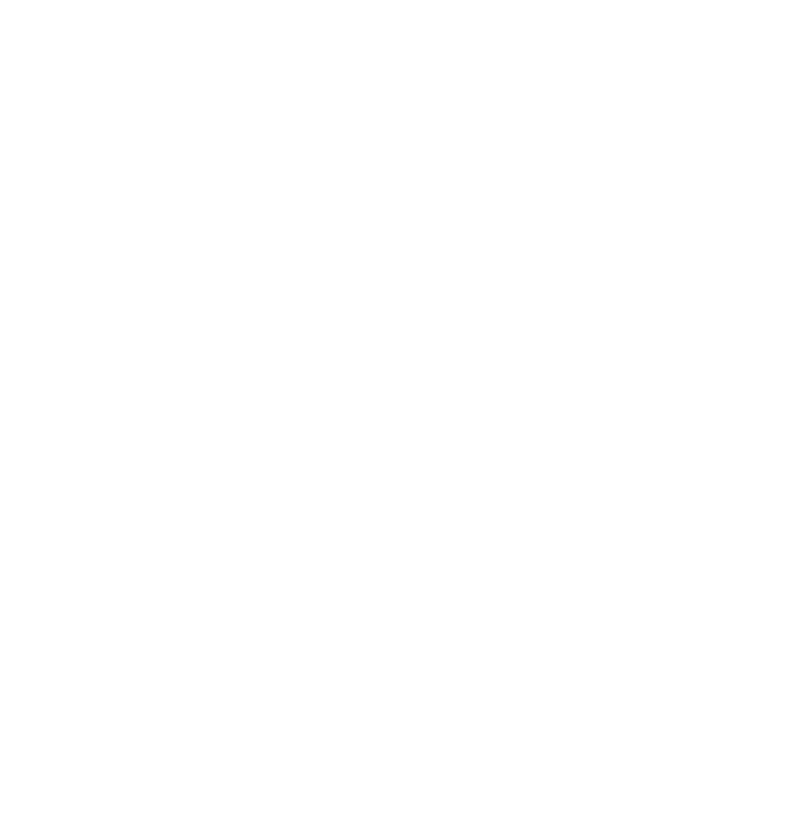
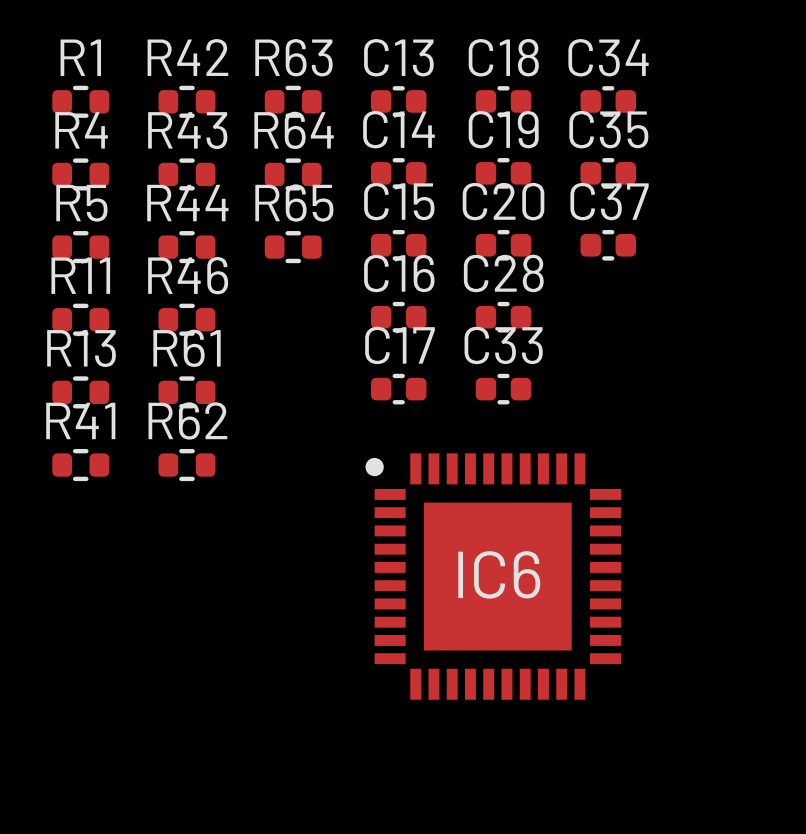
R1: none -> (80, 101)
R42: none -> (186, 101)
R63: none -> (293, 101)
C13: none -> (398, 101)
C18: none -> (503, 101)
C34: none -> (608, 101)
C14: none -> (398, 173)
C19: none -> (503, 173)
C35: none -> (608, 173)
R4: none -> (80, 174)
R43: none -> (186, 174)
R64: none -> (293, 174)
C15: none -> (398, 245)
C20: none -> (503, 245)
C37: none -> (608, 245)
R5: none -> (80, 247)
R44: none -> (186, 247)
R65: none -> (293, 247)
C16: none -> (398, 317)
C28: none -> (503, 317)
R11: none -> (80, 319)
R46: none -> (186, 319)
C17: none -> (398, 389)
C33: none -> (503, 389)
R13: none -> (80, 392)
R61: none -> (186, 392)
R41: none -> (80, 465)
R62: none -> (186, 465)
IC6: none -> (493, 576)

